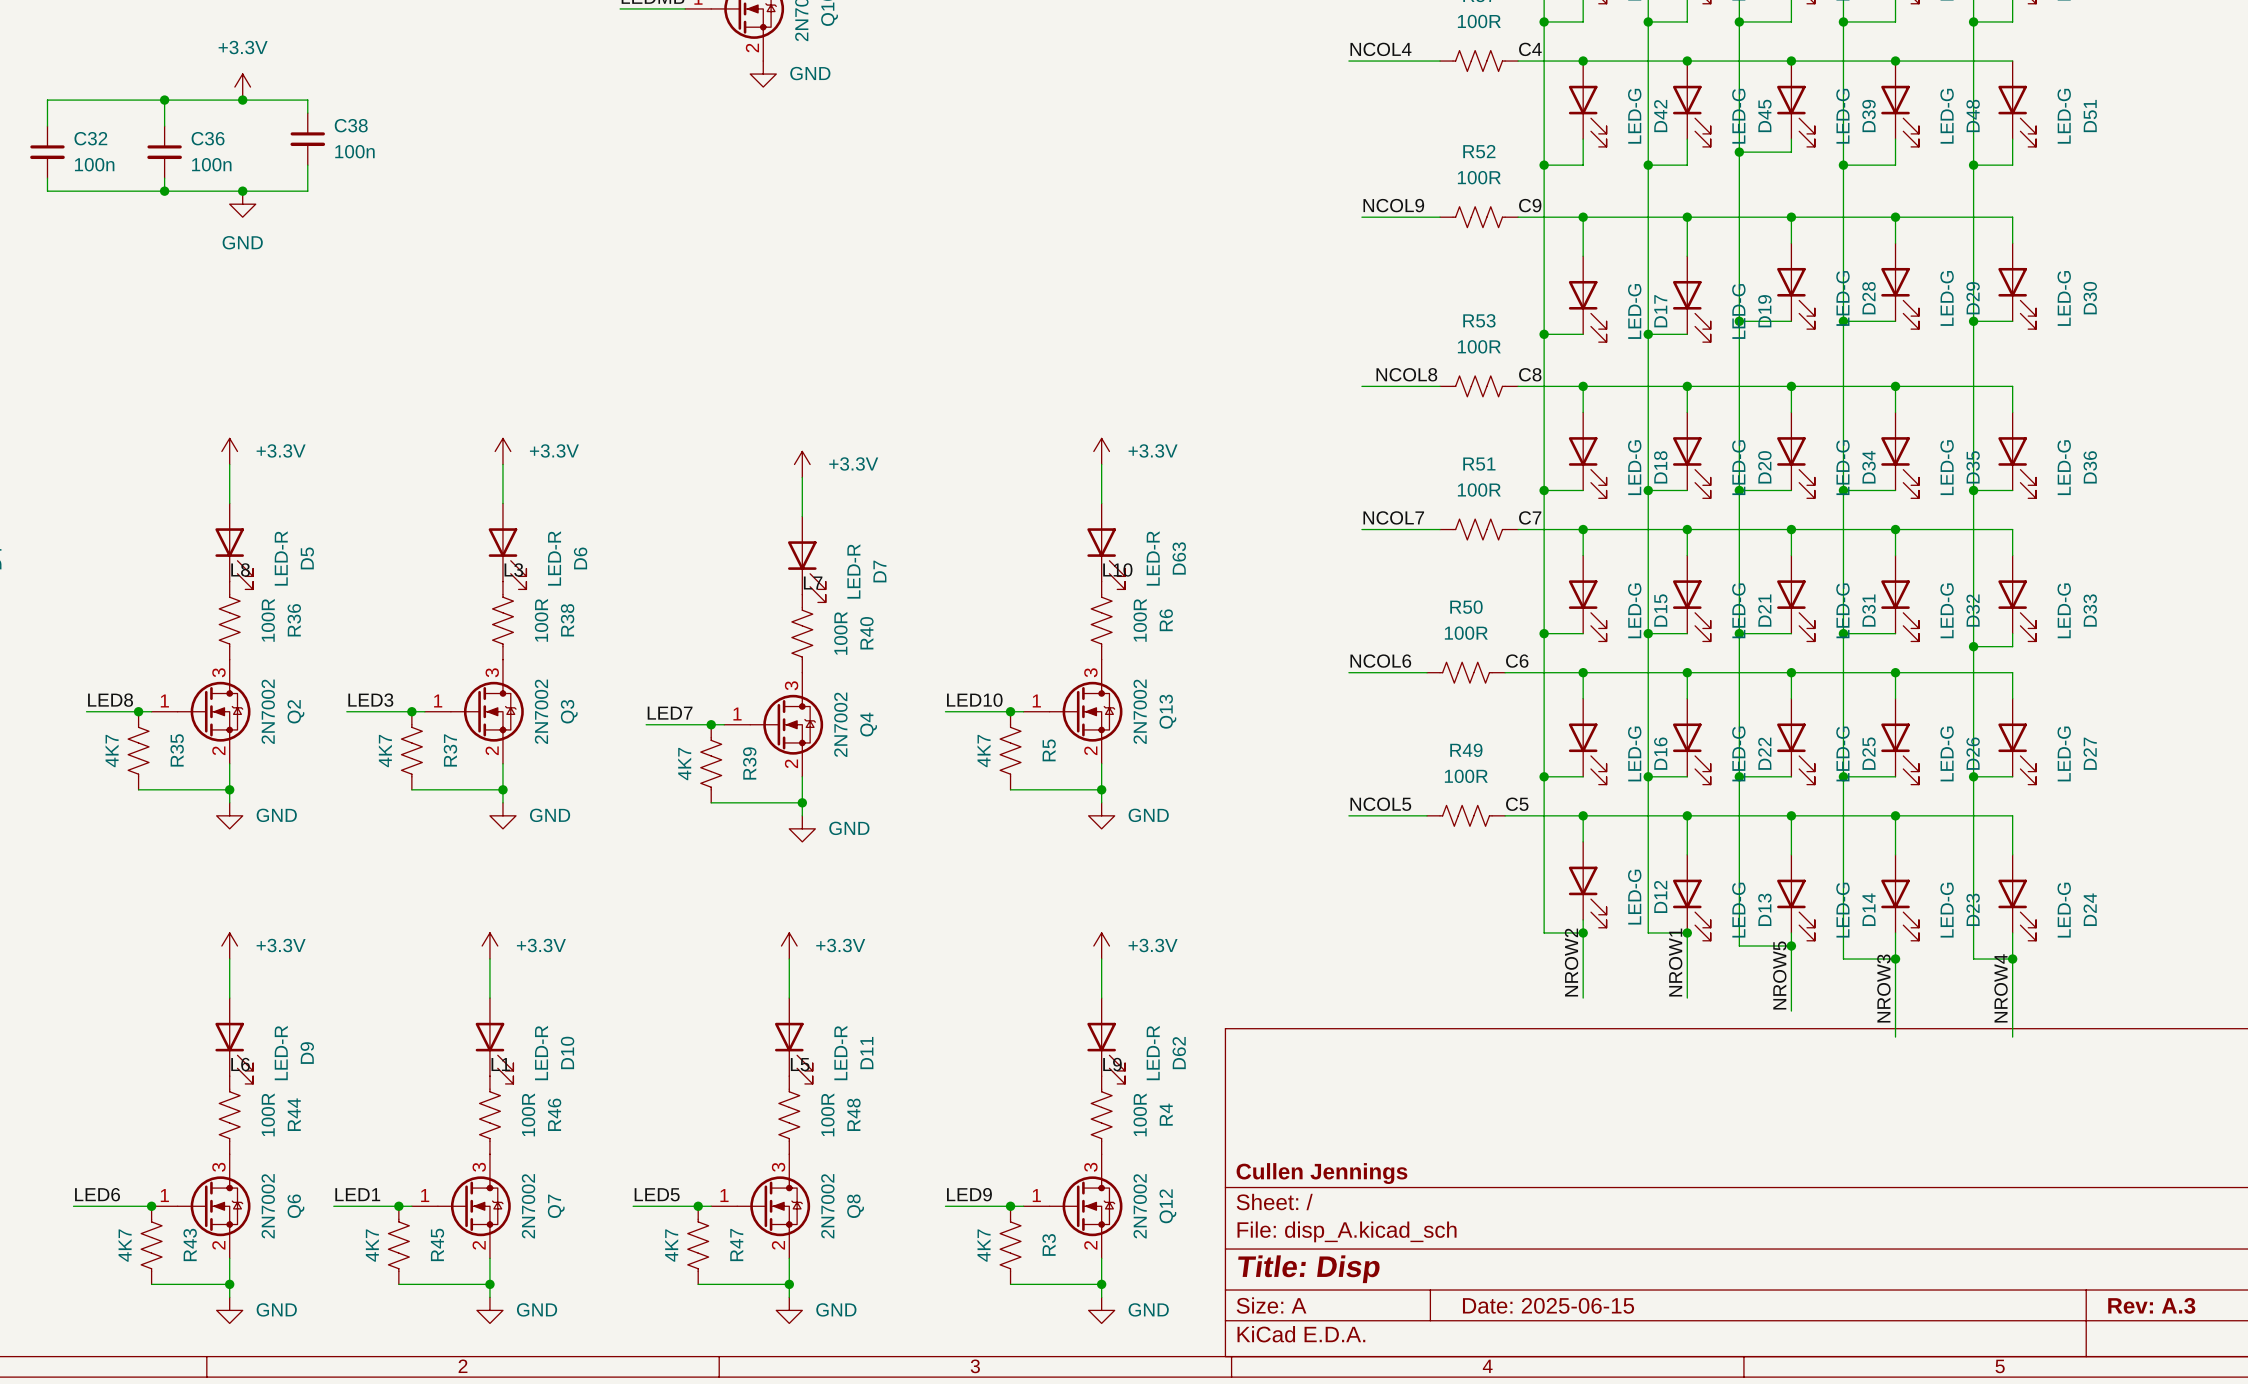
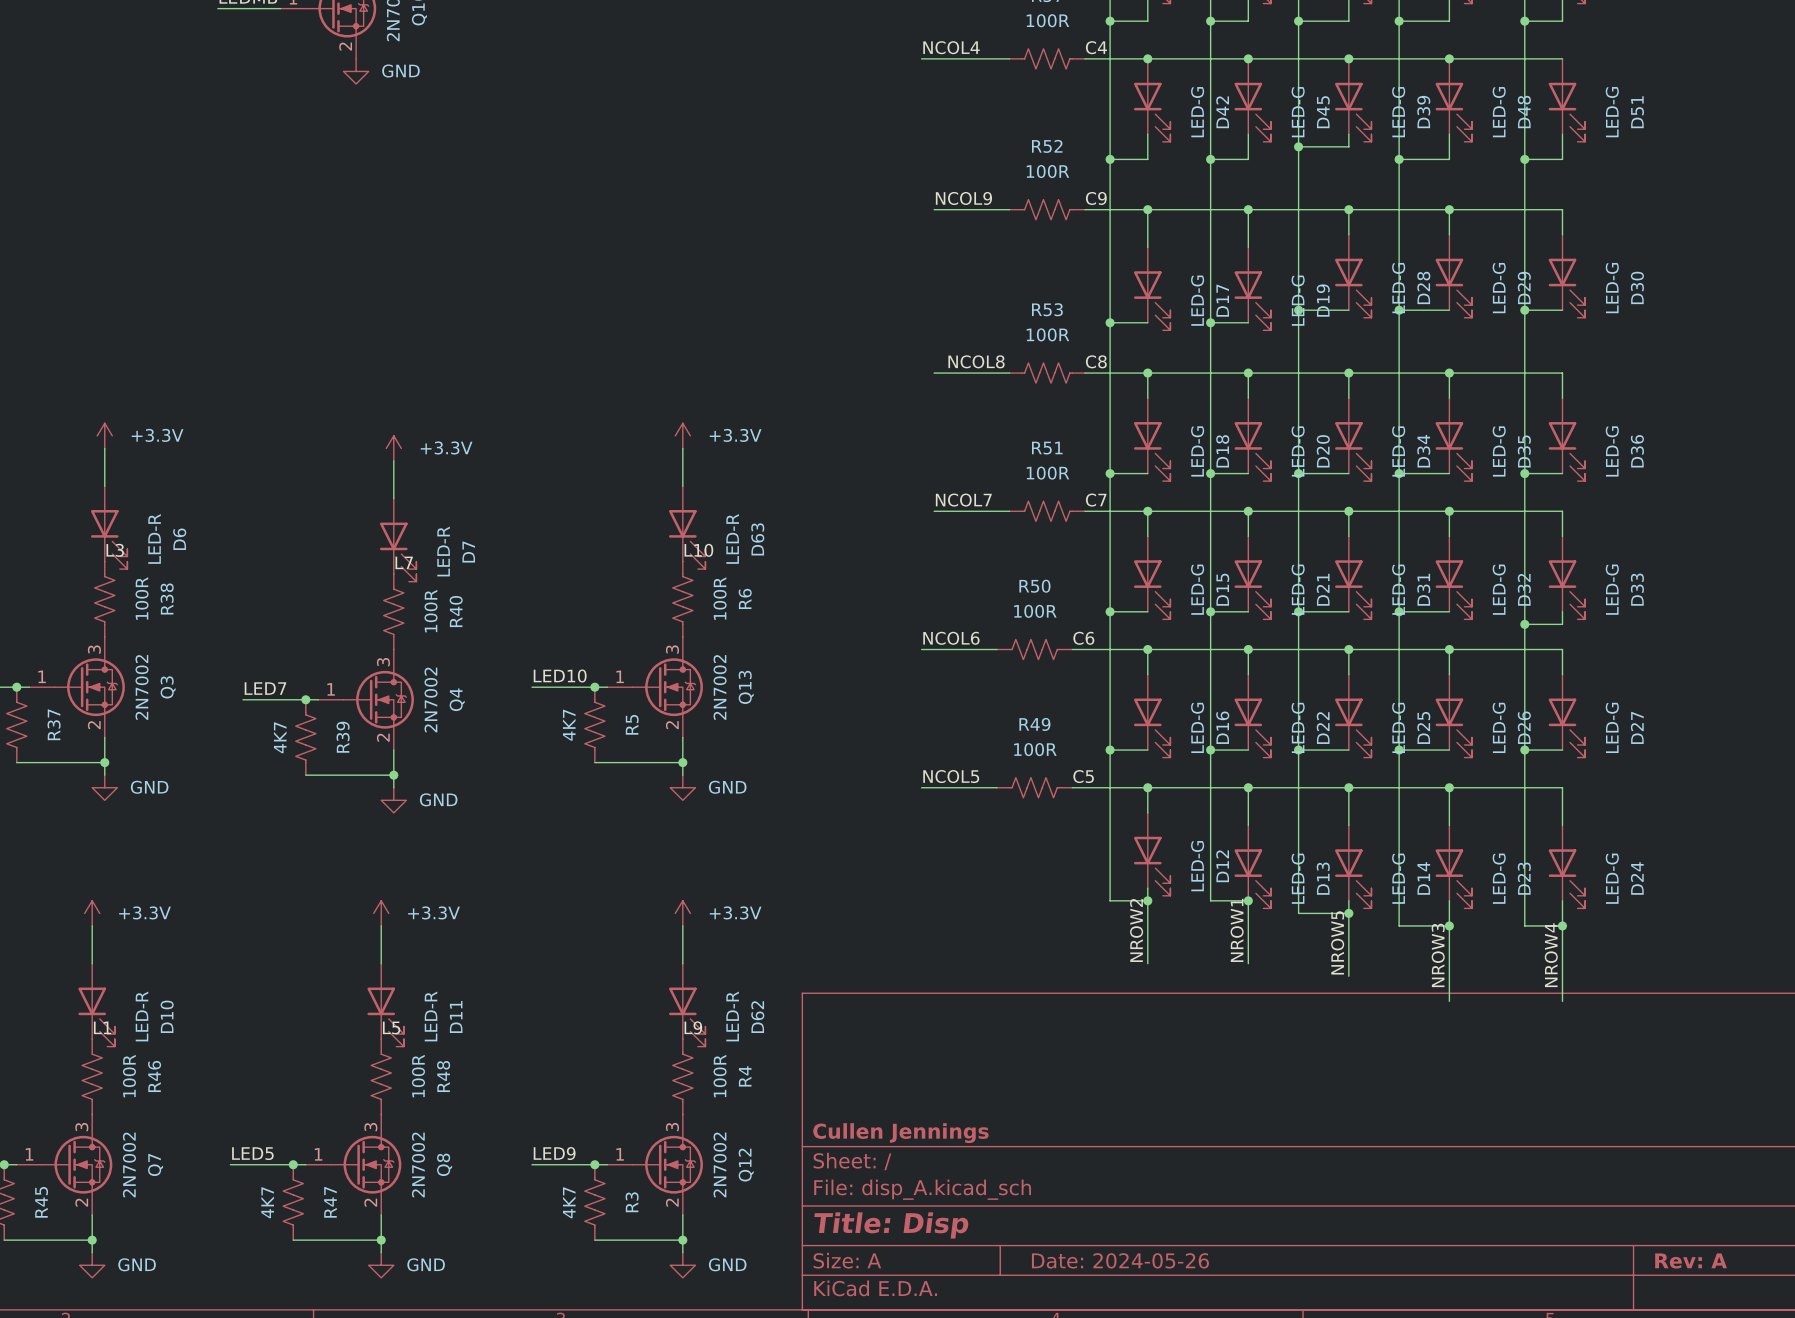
title block: Date: 2025-06-15 (1548, 1305) -> Date: 2024-05-26 (1120, 1260)
title block: Rev: A.3 (2151, 1305) -> Rev: A (1691, 1260)

